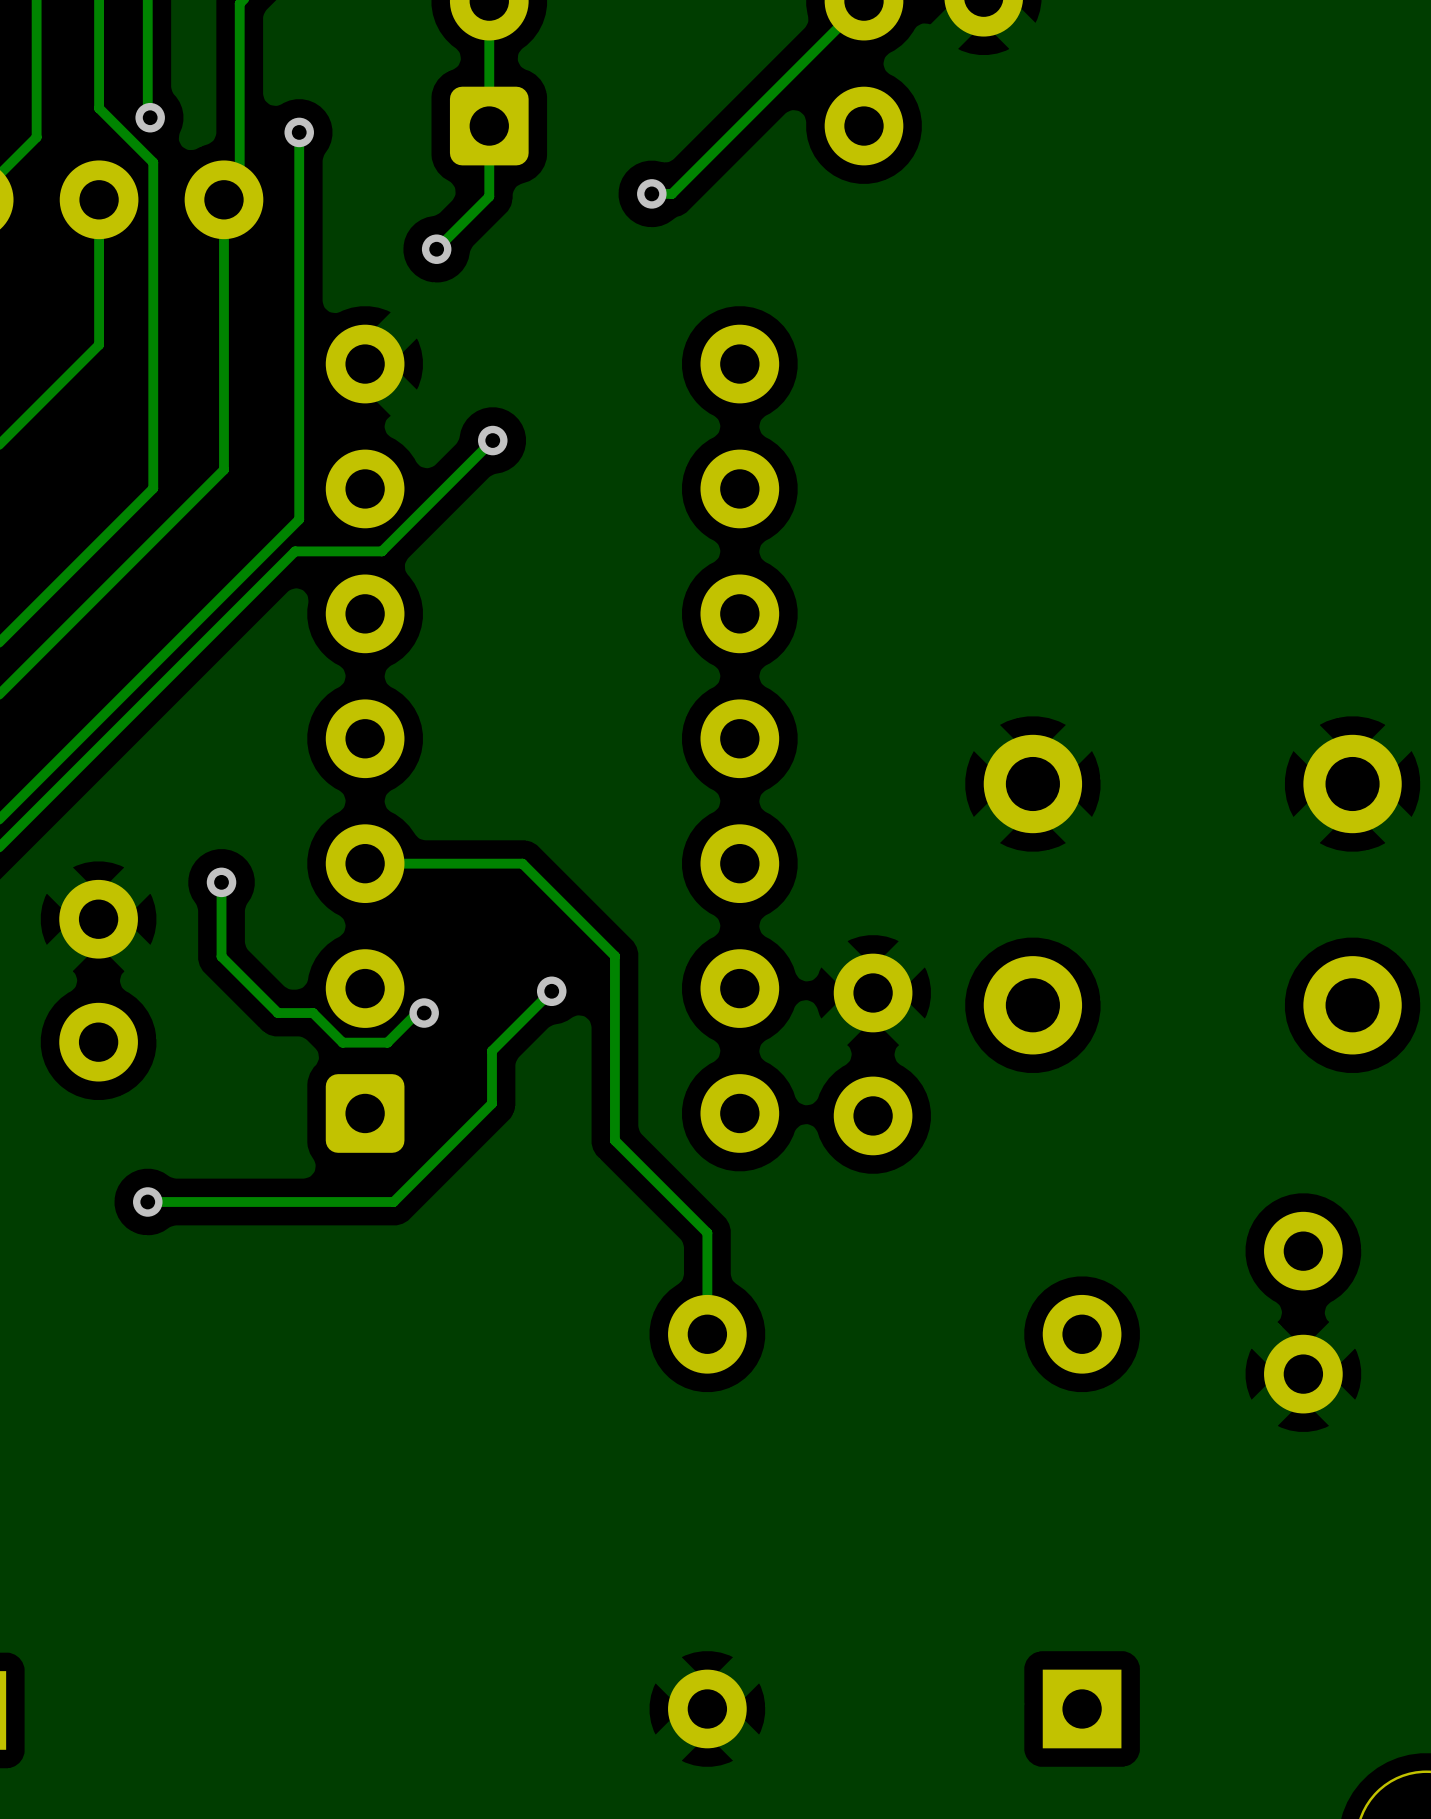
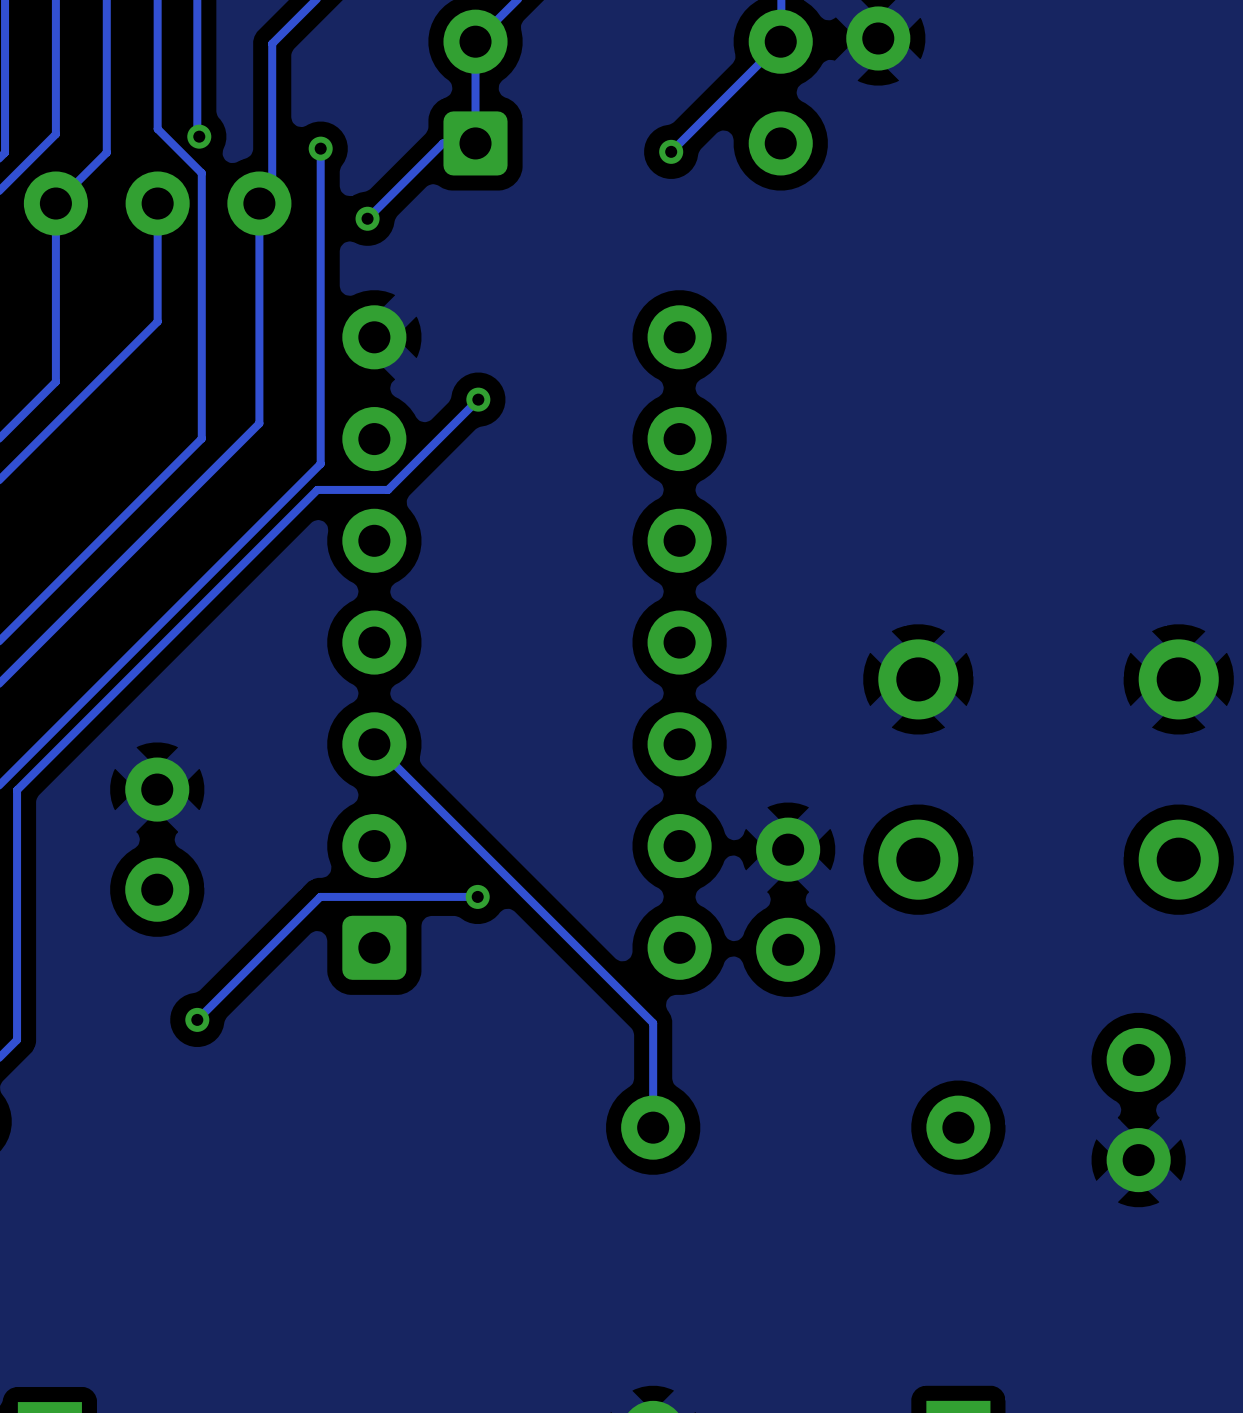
track: (489, 126) (489, 196) (436, 249) -> (475, 143) (442, 143) (367, 218)
track: (729, 136) (671, 193) (651, 193) -> none
via position: (651, 193) -> (671, 151)
via position: (436, 249) -> (367, 218)
track: (365, 863) (522, 863) (614, 956) (614, 1140) (707, 1232) -> (374, 744) (653, 1023) (653, 1045)
track: (221, 882) (221, 956) (277, 1013) (313, 1013) (342, 1042) (387, 1042) (417, 1013) (424, 1013) -> none
via: (221, 882) -> none
track: (551, 991) (491, 1051) (491, 1103) (393, 1201) (147, 1201) -> (477, 896) (320, 896) (197, 1019)
via: (551, 991) -> none
via: (424, 1013) -> none
via: none -> (477, 896)

